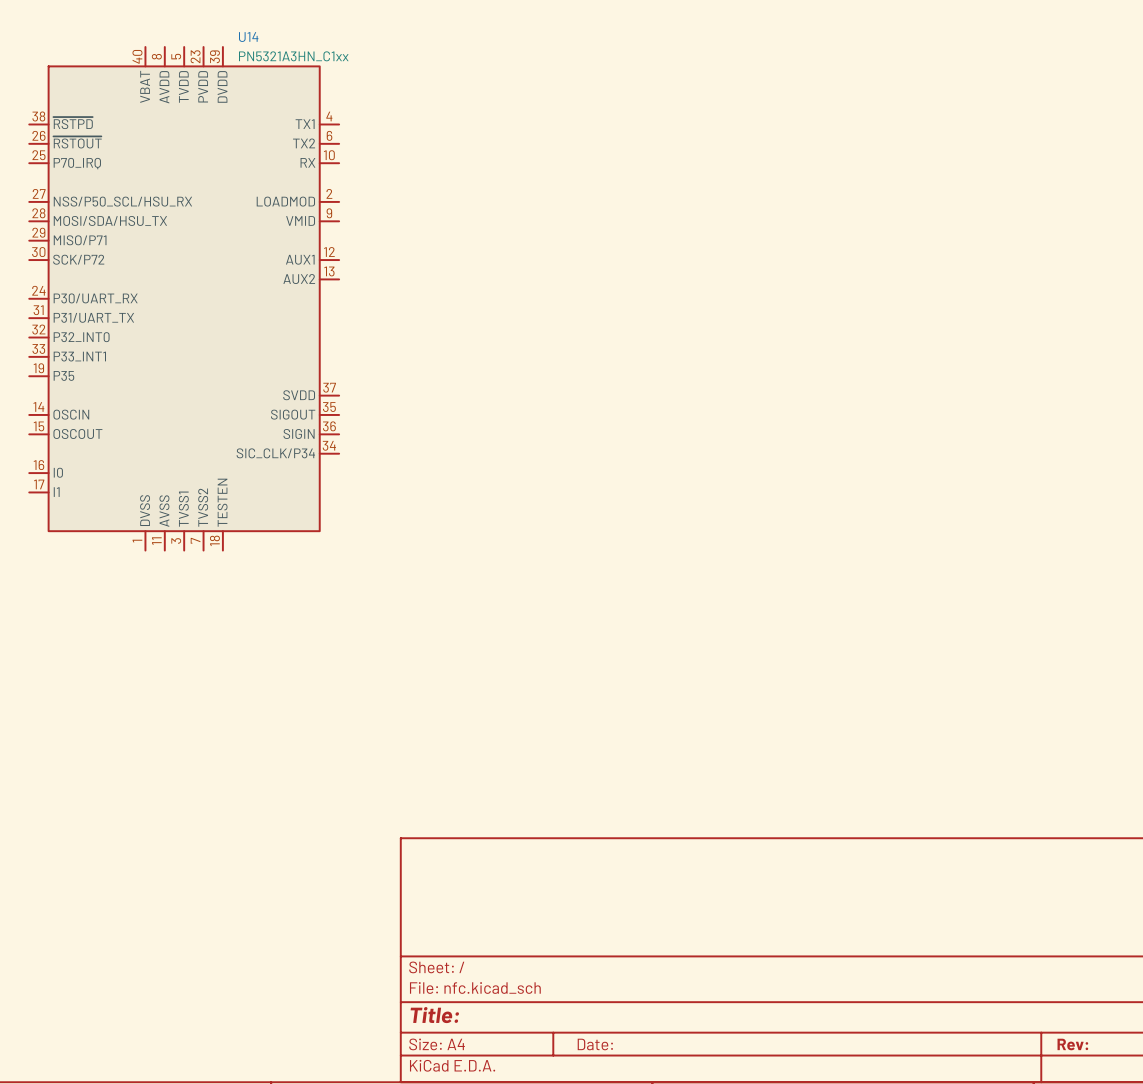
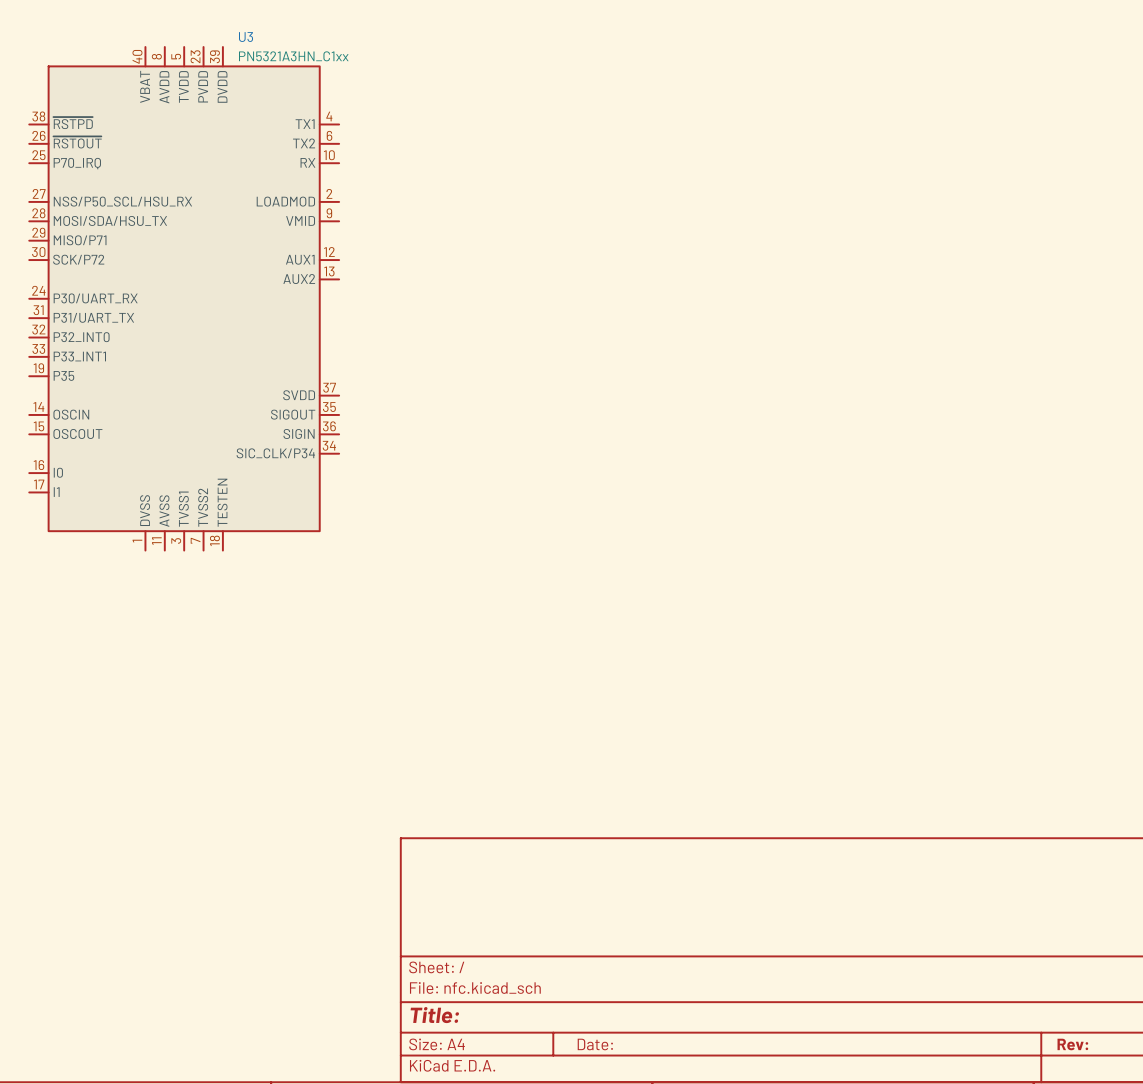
U14 name: U14 (248, 37) -> U3 (246, 37)

